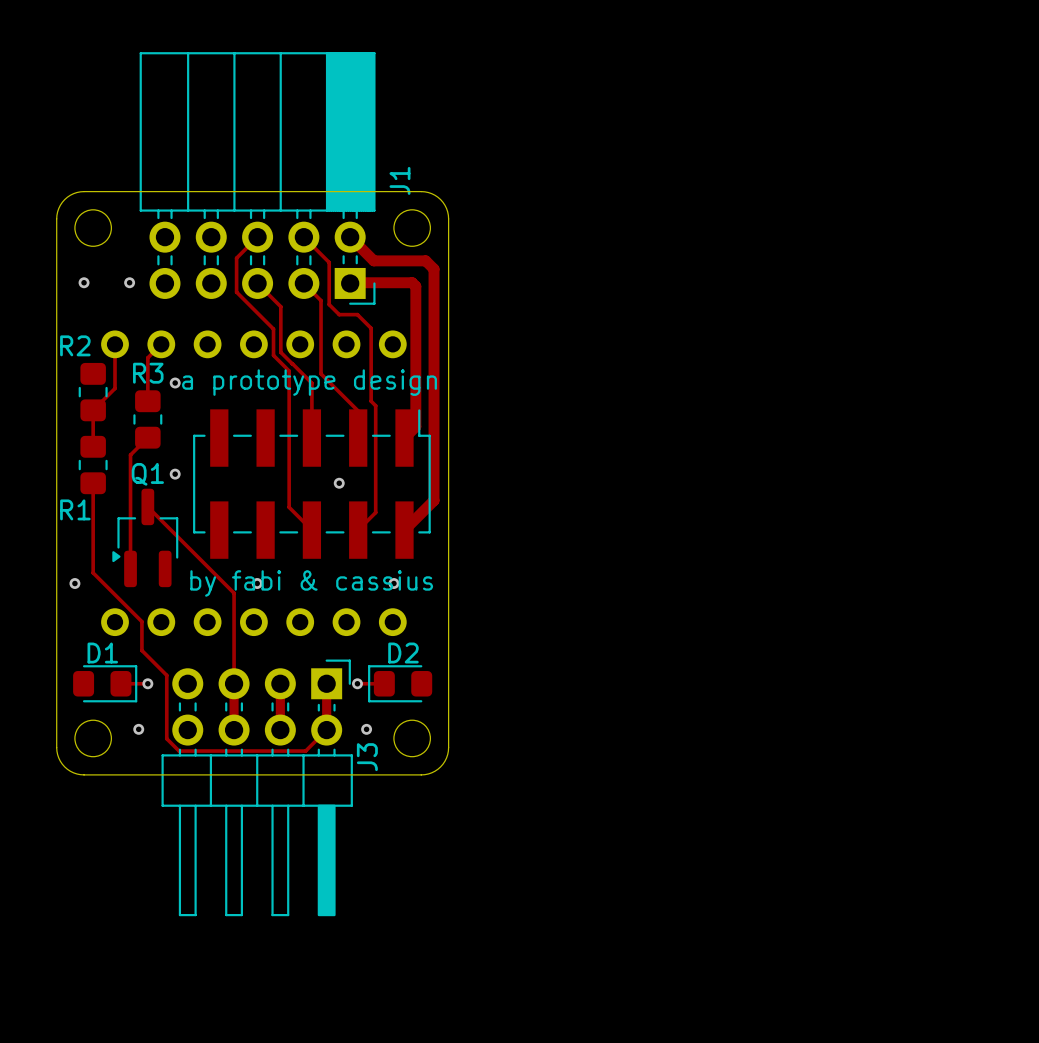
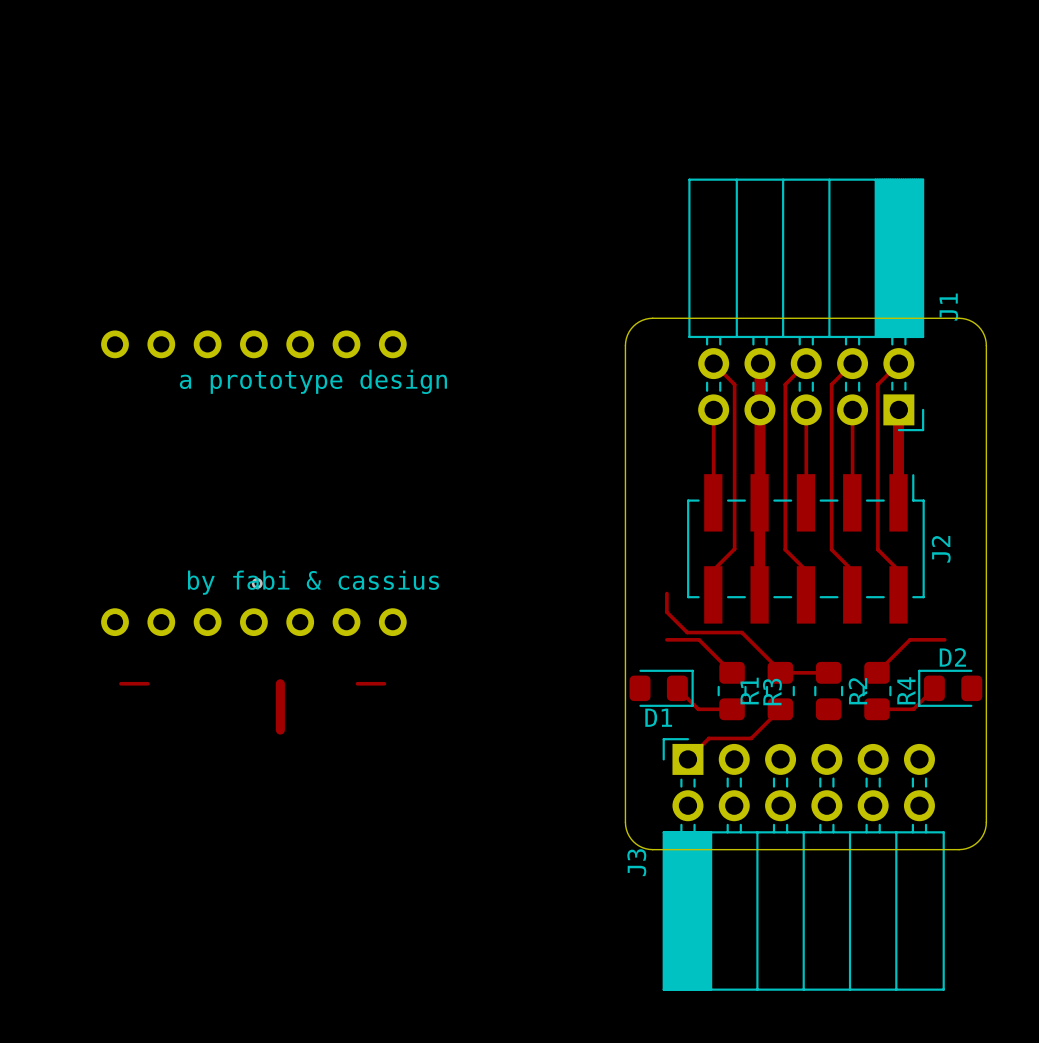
J1 position: (257, 178) -> (806, 304)
board edge: (84, 191) (421, 191) (434, 195) (444, 205) (448, 218) (448, 747) (444, 761) (434, 771) (421, 774) (84, 774) (70, 771) (60, 761) (56, 747) (56, 218) (58, 208) (64, 199) (73, 193) (84, 191) -> none
round board edge: [74, 209, 112, 247] -> none
round board edge: [393, 209, 431, 247] -> none
track: (257, 237) (236, 258) (236, 292) (273, 329) (273, 355) (289, 371) (289, 507) (311, 530) -> none
track: (303, 237) (329, 262) (329, 304) (339, 314) (357, 314) (371, 328) (371, 401) (375, 405) (375, 512) (358, 530) -> none
track: (350, 237) (373, 260) (425, 260) (434, 269) (434, 500) (404, 530) -> none
via: (84, 282) -> none
via: (129, 282) -> none
track: (257, 283) (280, 306) (280, 352) (292, 363) -> none
track: (303, 283) (321, 300) (321, 373) (358, 411) (358, 438) -> none
track: (350, 283) (412, 282) (415, 286) (415, 426) (404, 438) -> none
board edge: none -> (652, 318) (959, 318) (972, 321) (982, 331) (986, 345) (986, 822) (982, 835) (972, 845) (959, 849) (652, 849) (639, 845) (629, 835) (625, 822) (625, 345) (627, 335) (633, 326) (642, 320) (652, 318)
track: (115, 344) (115, 388) (93, 410) (93, 446) -> none
track: (161, 344) (147, 357) (147, 401) -> none
R2 name rotation: 0° (75, 345) -> 90° counterclockwise (857, 691)
R2 name position: R2 (75, 345) -> R2 (857, 691)
track: (292, 363) (311, 383) (311, 438) -> none
track: none -> (713, 363) (734, 384) (734, 548) (713, 570)
track: none -> (759, 363) (759, 570)
track: none -> (806, 363) (785, 384) (785, 549) (805, 570)
track: none -> (852, 363) (831, 384) (831, 549) (852, 570)
track: none -> (898, 363) (877, 384) (877, 549) (898, 570)
R3 name rotation: 0° (148, 373) -> 90° counterclockwise (772, 692)
R3 name position: R3 (148, 373) -> R3 (772, 692)
via: (175, 382) -> none
R2 position: (93, 392) -> (828, 691)
track: none -> (713, 409) (713, 478)
track: none -> (806, 409) (805, 478)
track: none -> (852, 409) (852, 478)
track: none -> (898, 409) (898, 478)
R3 position: (147, 419) -> (732, 691)
track: (147, 437) (130, 455) (130, 568) -> none
R1 position: (93, 465) -> (780, 691)
via: (175, 474) -> none
track: (93, 483) (93, 572) (141, 621) (141, 650) (166, 675) (166, 738) (179, 751) (305, 751) (326, 730) (326, 683) -> none
via: (339, 483) -> none
part: (311, 484) -> none
track: (147, 506) (234, 593) (234, 730) -> none
R1 name rotation: 0° (75, 509) -> 90° counterclockwise (749, 691)
R1 name position: R1 (75, 509) -> R1 (749, 691)
Q1: (145, 537) -> none
J2: none -> (805, 548)
via: (74, 583) -> none
via: (393, 583) -> none
track: none -> (666, 593) (666, 612) (687, 632) (741, 632) (780, 672) (828, 672)
track: none -> (666, 639) (699, 639) (732, 672)
track: none -> (944, 639) (909, 639) (876, 672)
D1 name position: D1 (102, 653) -> D1 (658, 717)
J3 footprint: [161, 659, 353, 917] -> [662, 738, 945, 991]
D1 position: (105, 683) -> (661, 688)
via: (147, 683) -> none
via: (357, 683) -> none
D2 position: (400, 683) -> (950, 688)
track: none -> (677, 688) (698, 709) (732, 709)
track: none -> (934, 688) (913, 709) (876, 709)
R4: none -> (876, 691)
track: none -> (780, 709) (751, 738) (708, 738) (687, 759)
round board edge: [74, 719, 112, 758] -> none
round board edge: [393, 719, 431, 758] -> none
via: (138, 729) -> none
via: (366, 729) -> none
J3 name position: J3 (367, 757) -> J3 (636, 862)

